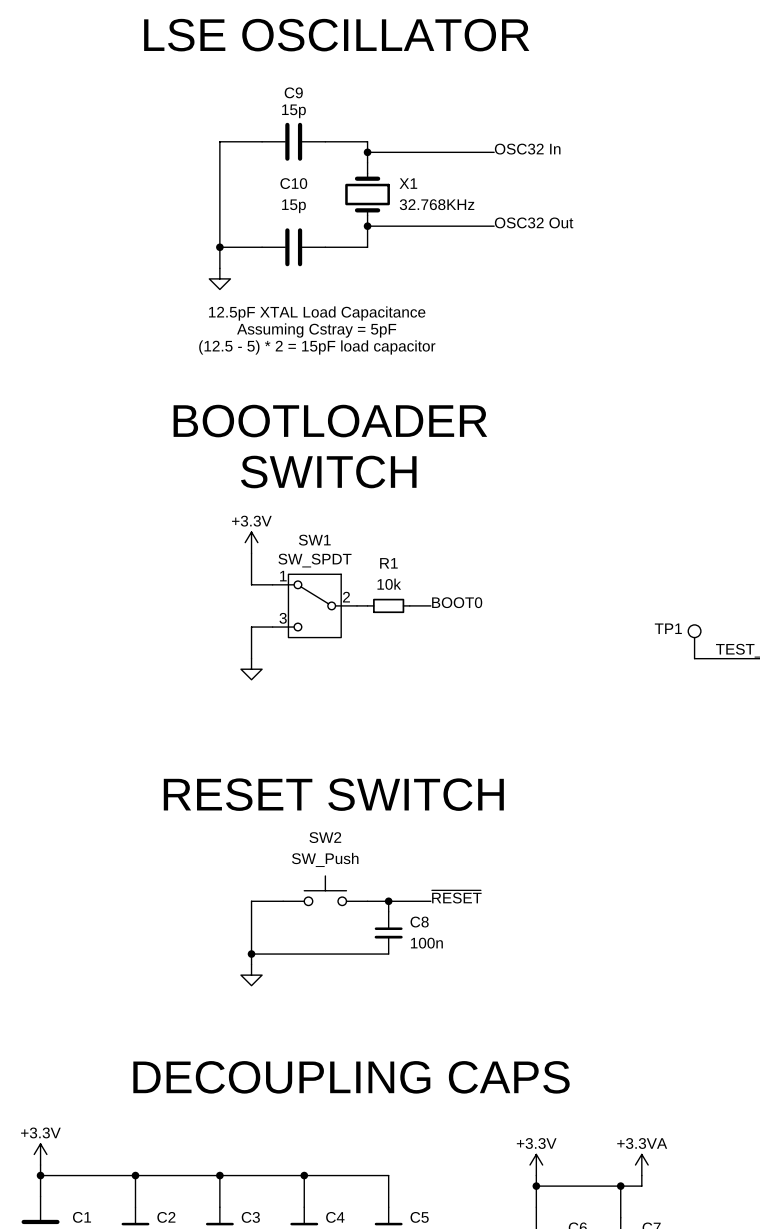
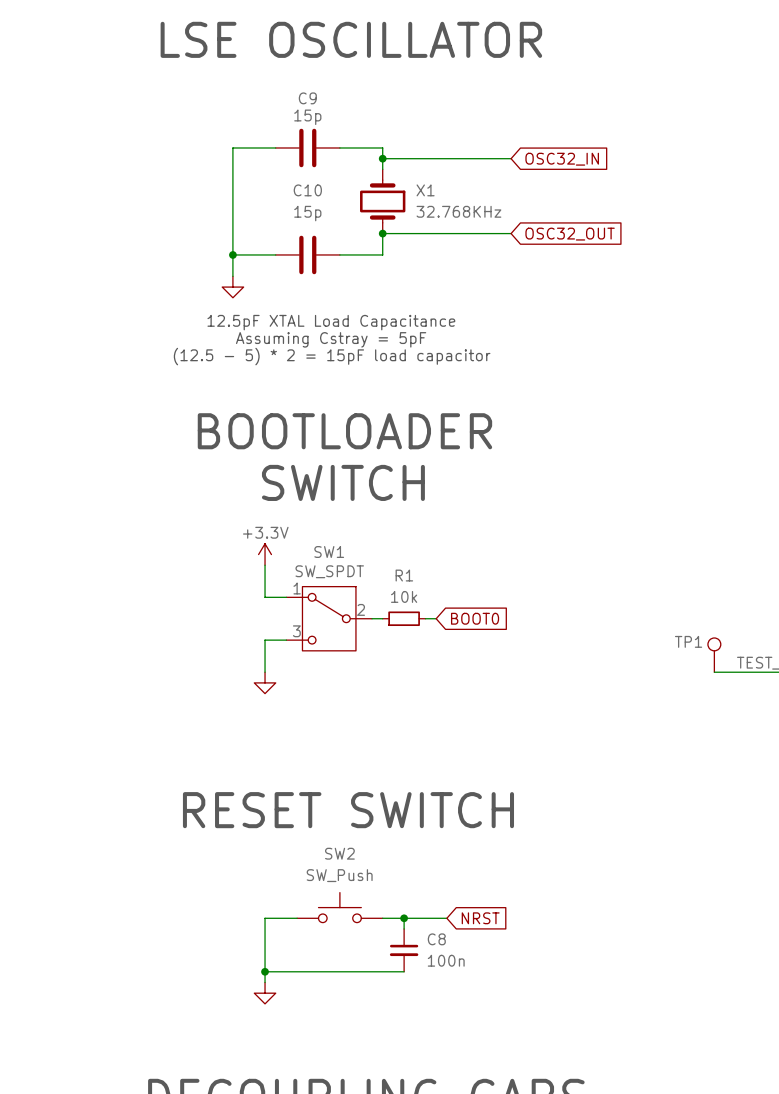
label: OSC32 In (527, 149) -> none
global label: none -> OSC32_IN (562, 159)
label: OSC32 Out (534, 222) -> none
global label: none -> OSC32_OUT (570, 234)
label: BOOT0 (457, 602) -> none
wire: (420, 605) (430, 605) -> none
global label: none -> BOOT0 (475, 618)
label: ~{RESET} (456, 896) -> none
global label: none -> NRST (480, 918)

